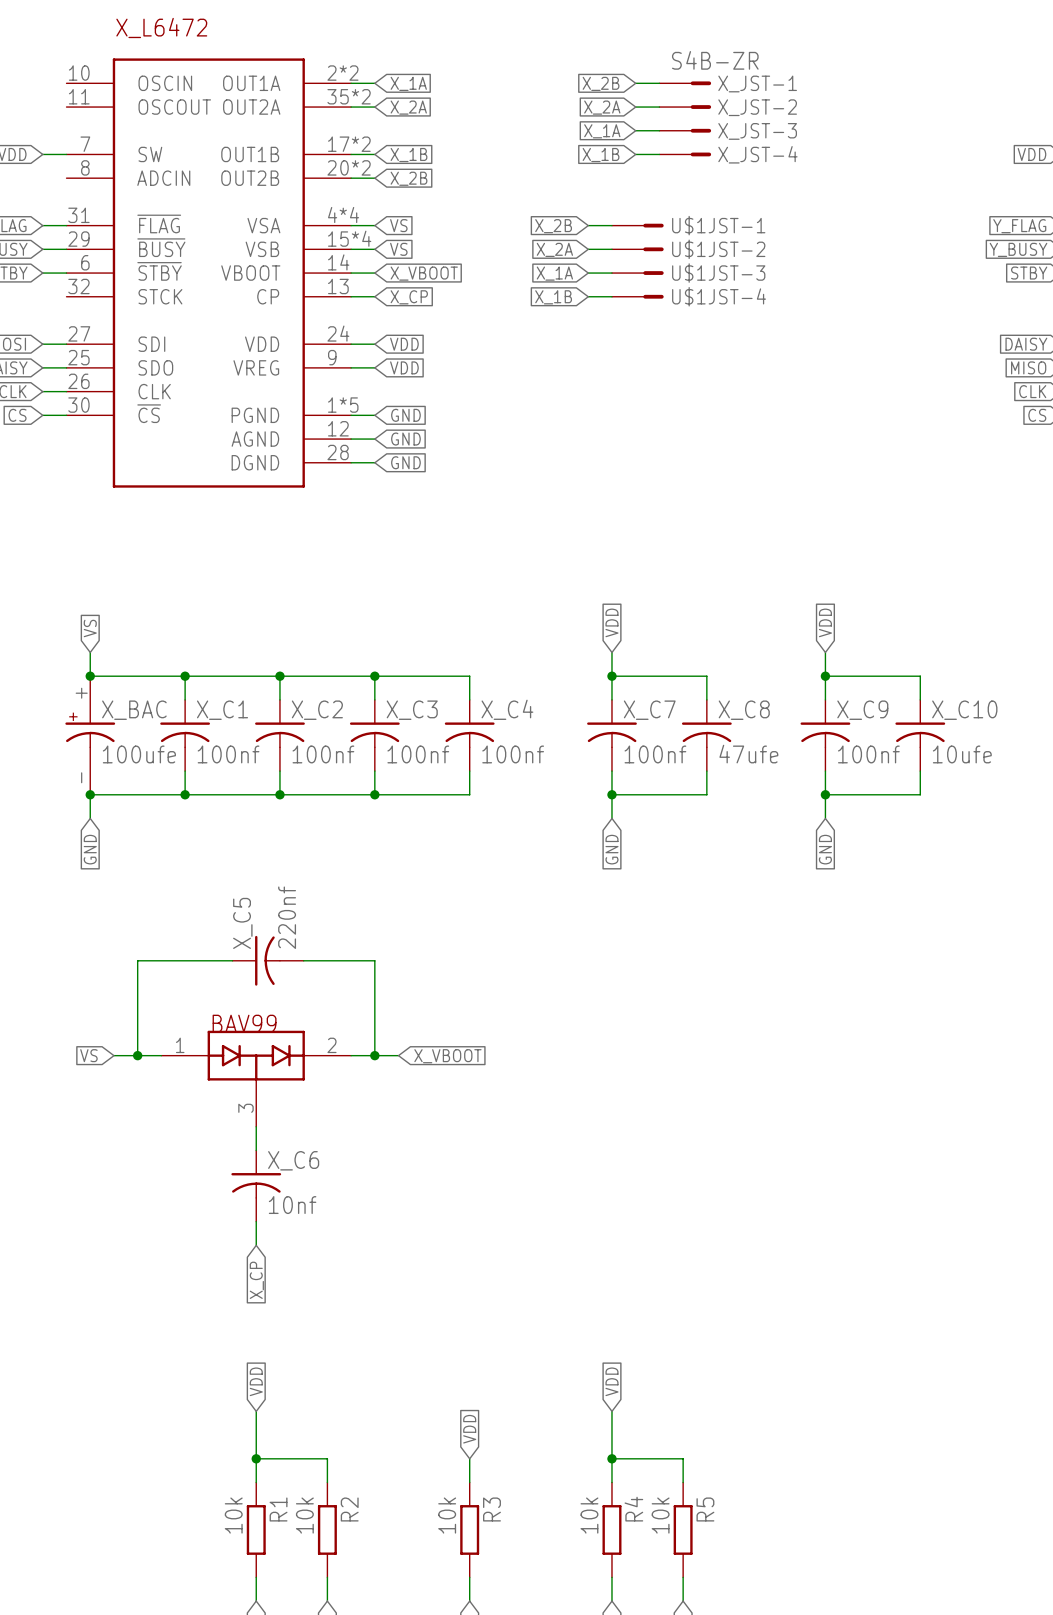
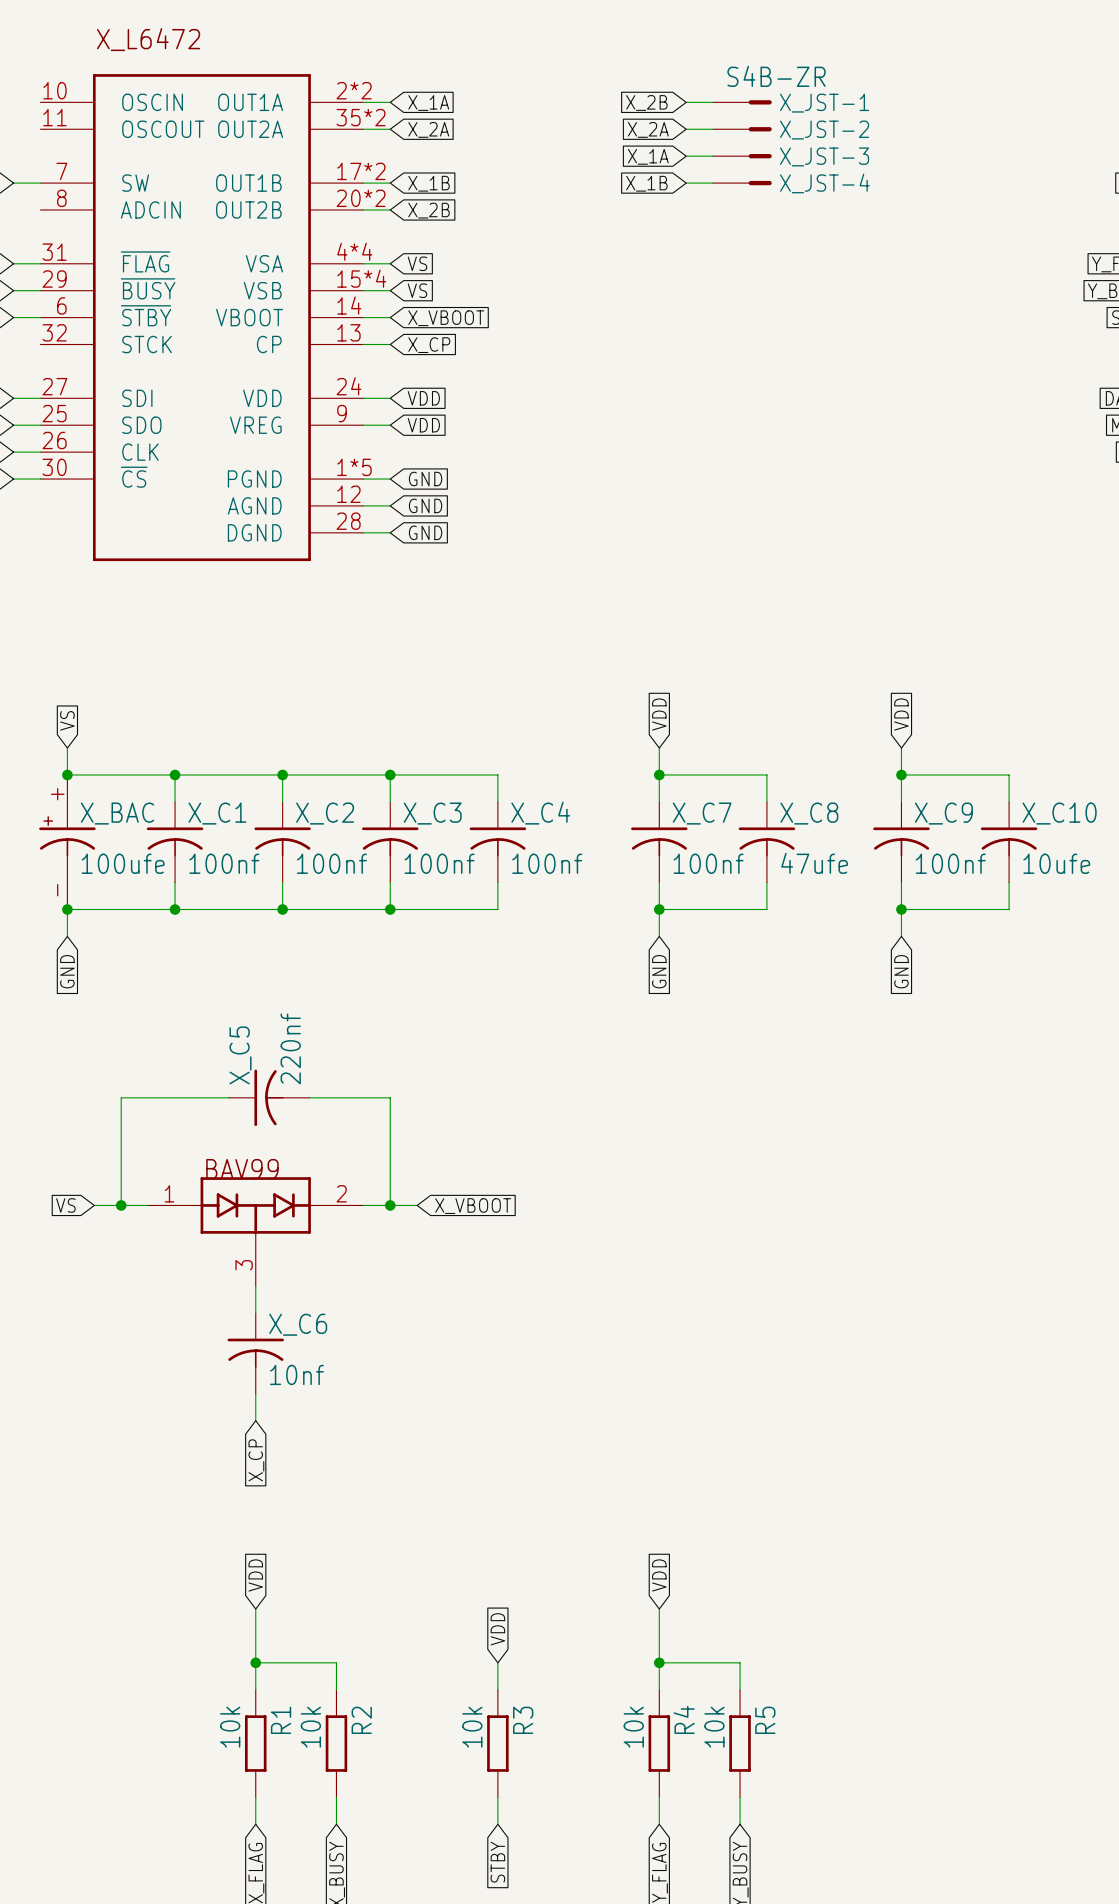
wire: (588, 225) (611, 225) -> none
U$1JST-1: (637, 225) -> none
global label: X_2B (553, 226) -> none
global label: X_2A (554, 249) -> none
wire: (588, 249) (611, 249) -> none
U$1JST-2: (637, 249) -> none
global label: X_1A (554, 273) -> none
wire: (588, 273) (611, 273) -> none
U$1JST-3: (637, 273) -> none
wire: (588, 296) (611, 296) -> none
U$1JST-4: (637, 296) -> none
global label: X_1B (553, 297) -> none

